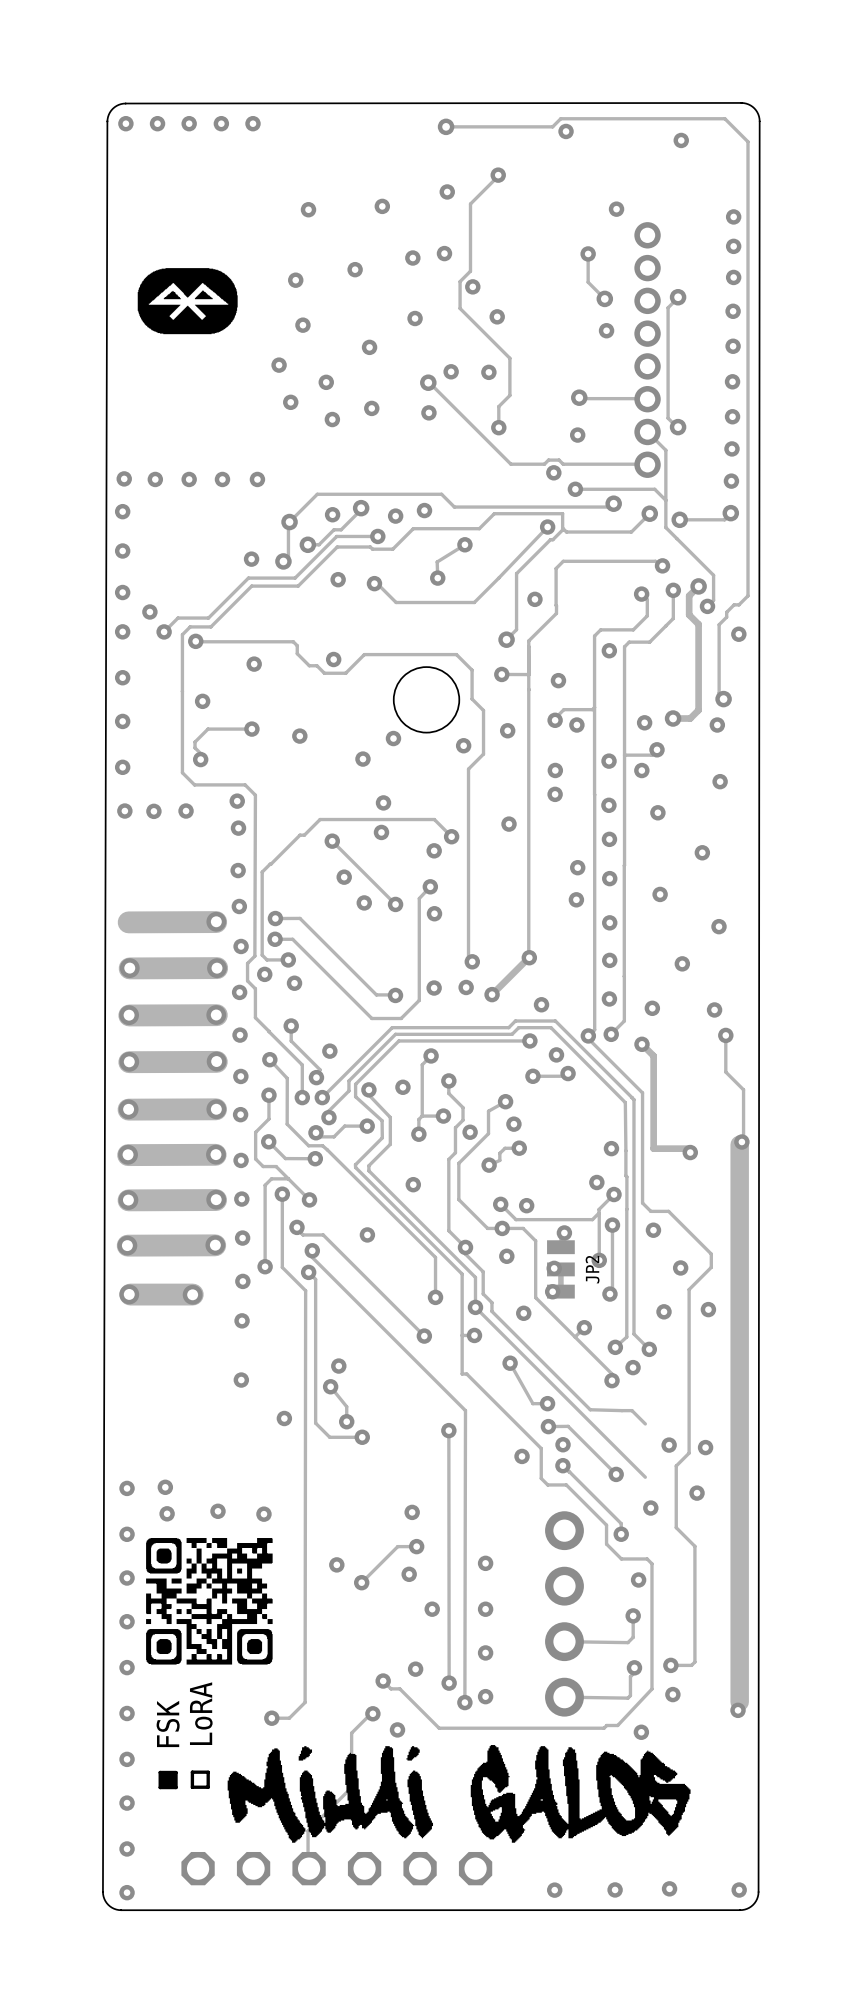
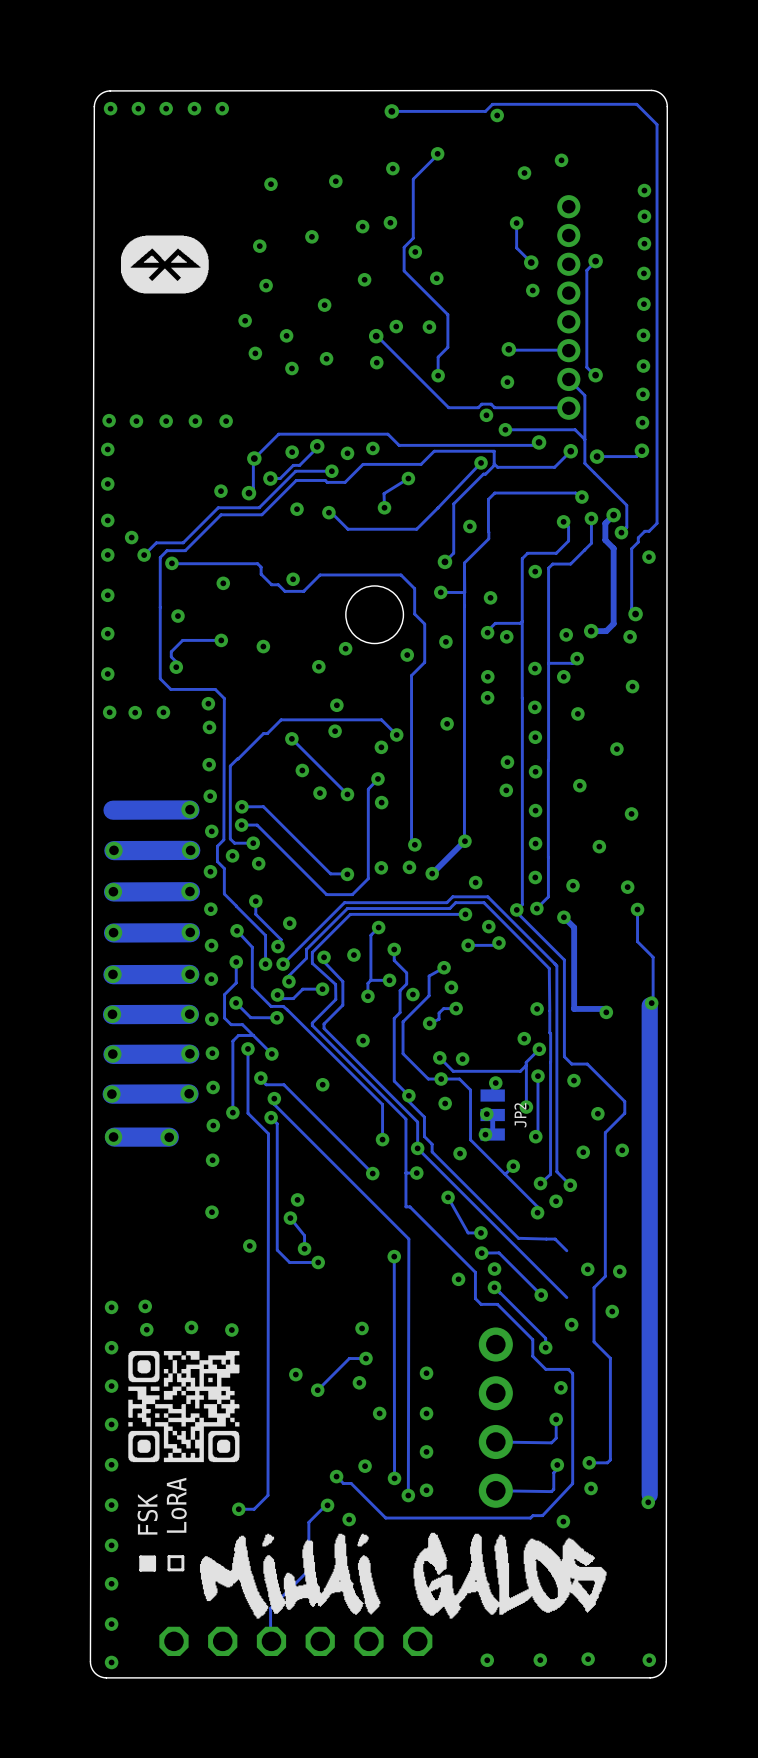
via: (681, 140) -> none
via: none -> (561, 160)
via: none -> (524, 173)
via: (616, 209) -> none

